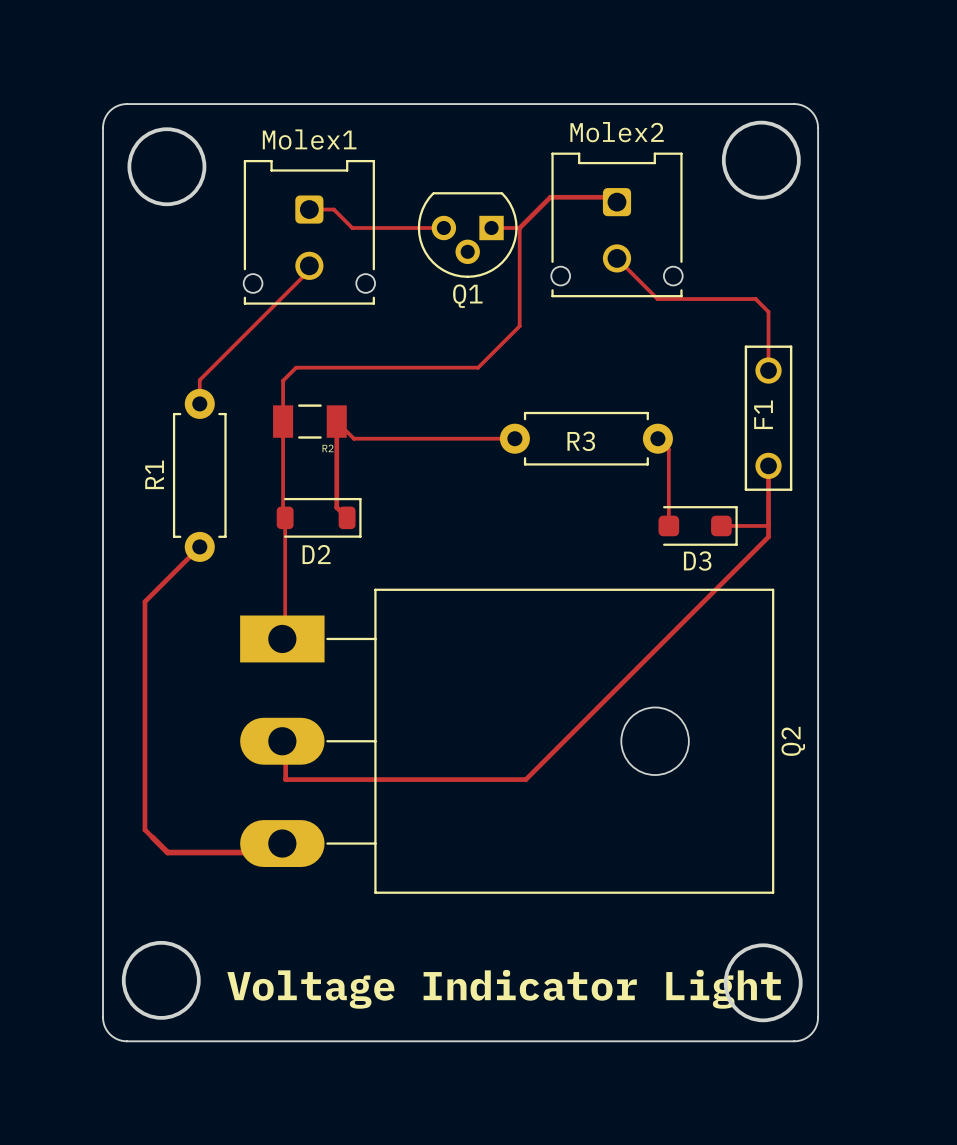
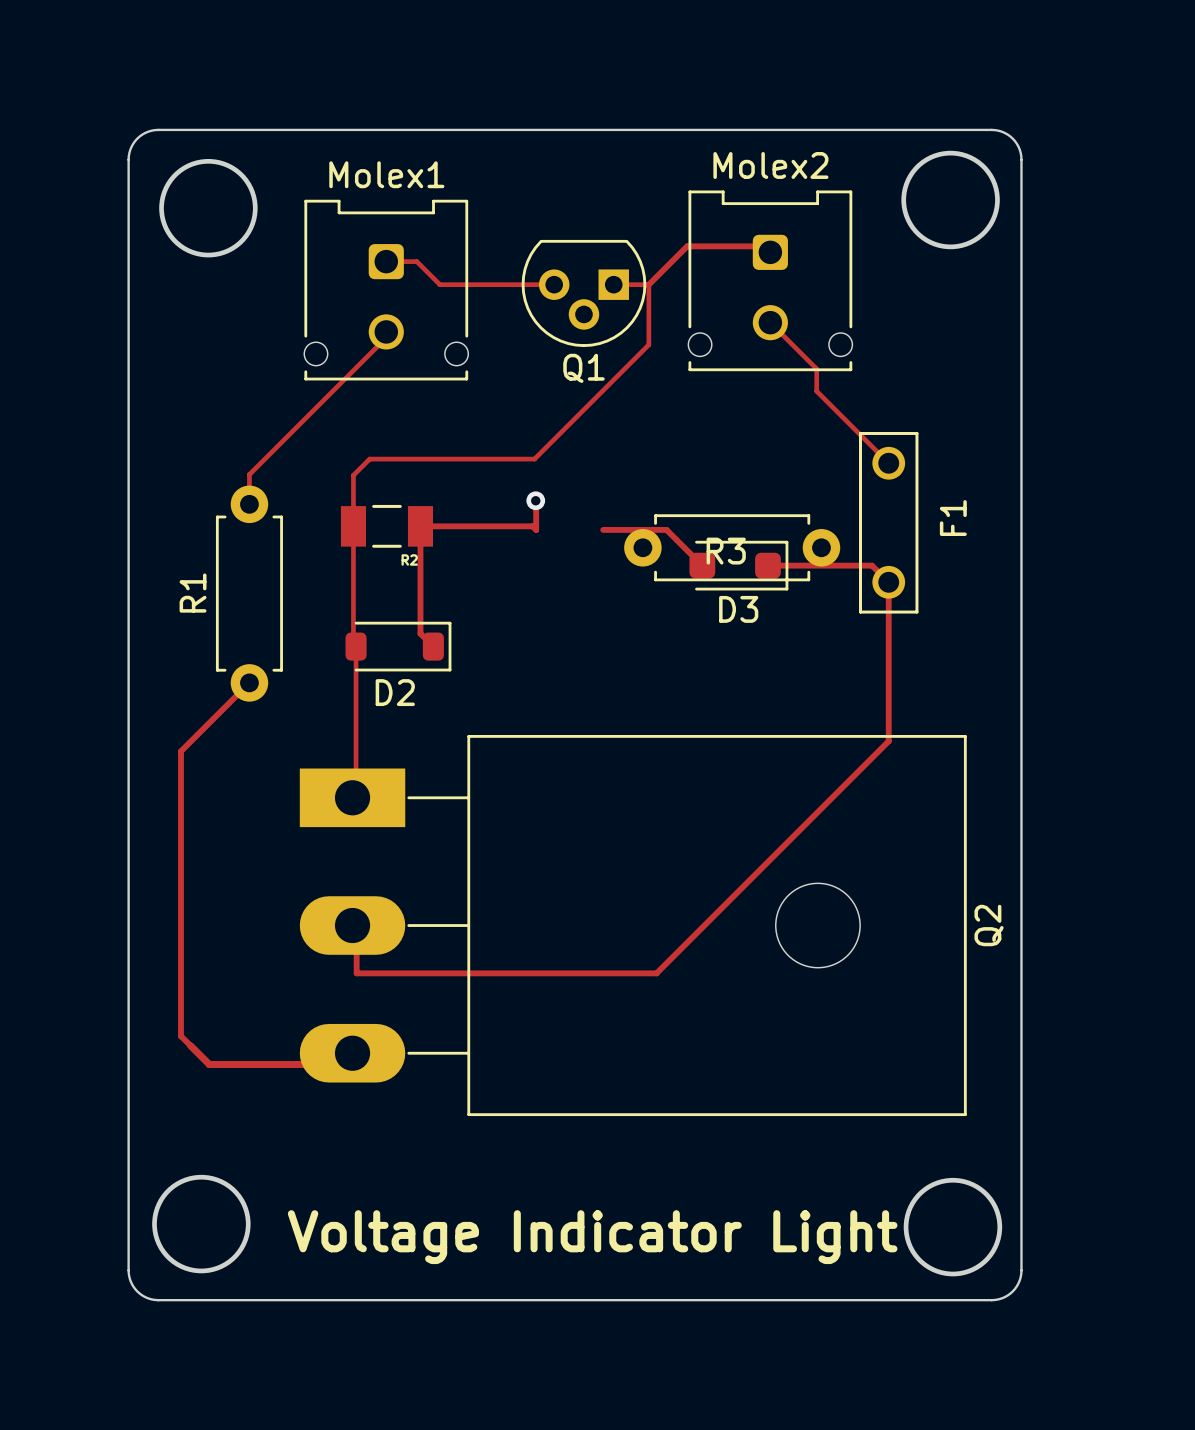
track: (519, 276) (519, 326) (478, 367) (428, 367) -> (648, 344) (534, 459)
track: (654, 295) (657, 299) (755, 299) (768, 311) (768, 370) -> (816, 369) (816, 391) (888, 463)
via: none -> (535, 500)
F1 position: (768, 418) -> (888, 522)
track: (336, 421) (353, 438) (514, 438) -> (420, 526) (532, 526) (536, 529) (535, 500)
track: none -> (603, 529) (666, 529) (702, 565)
track: (657, 438) (668, 449) (668, 525) -> none
track: (768, 465) (768, 536) (711, 593) -> (767, 565) (872, 565) (888, 582) (888, 741)
D3 position: (698, 525) -> (738, 565)
track: (768, 525) (721, 525) -> none

